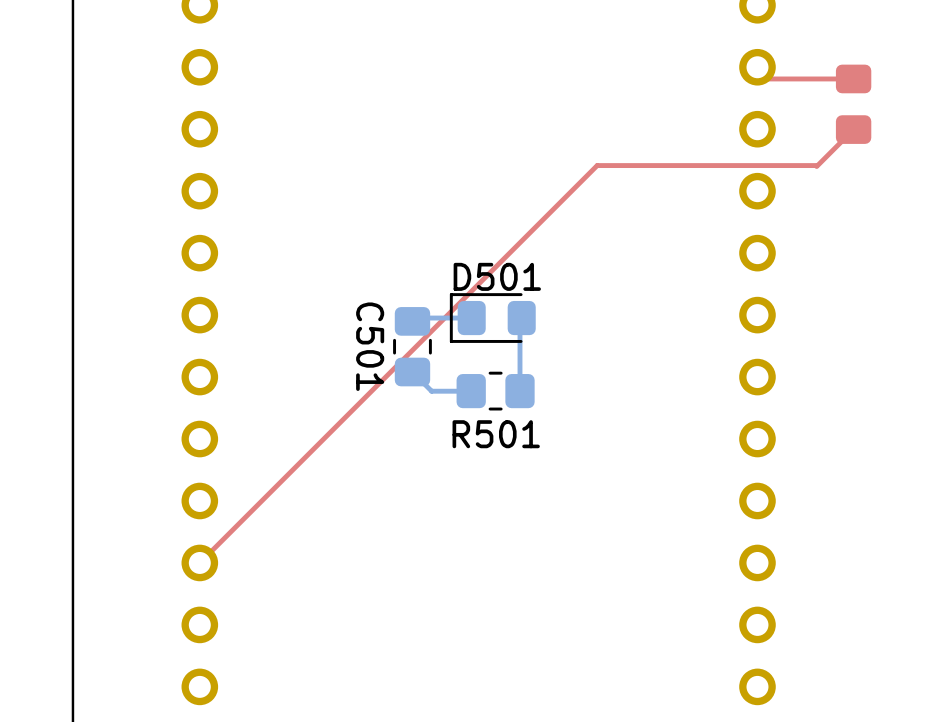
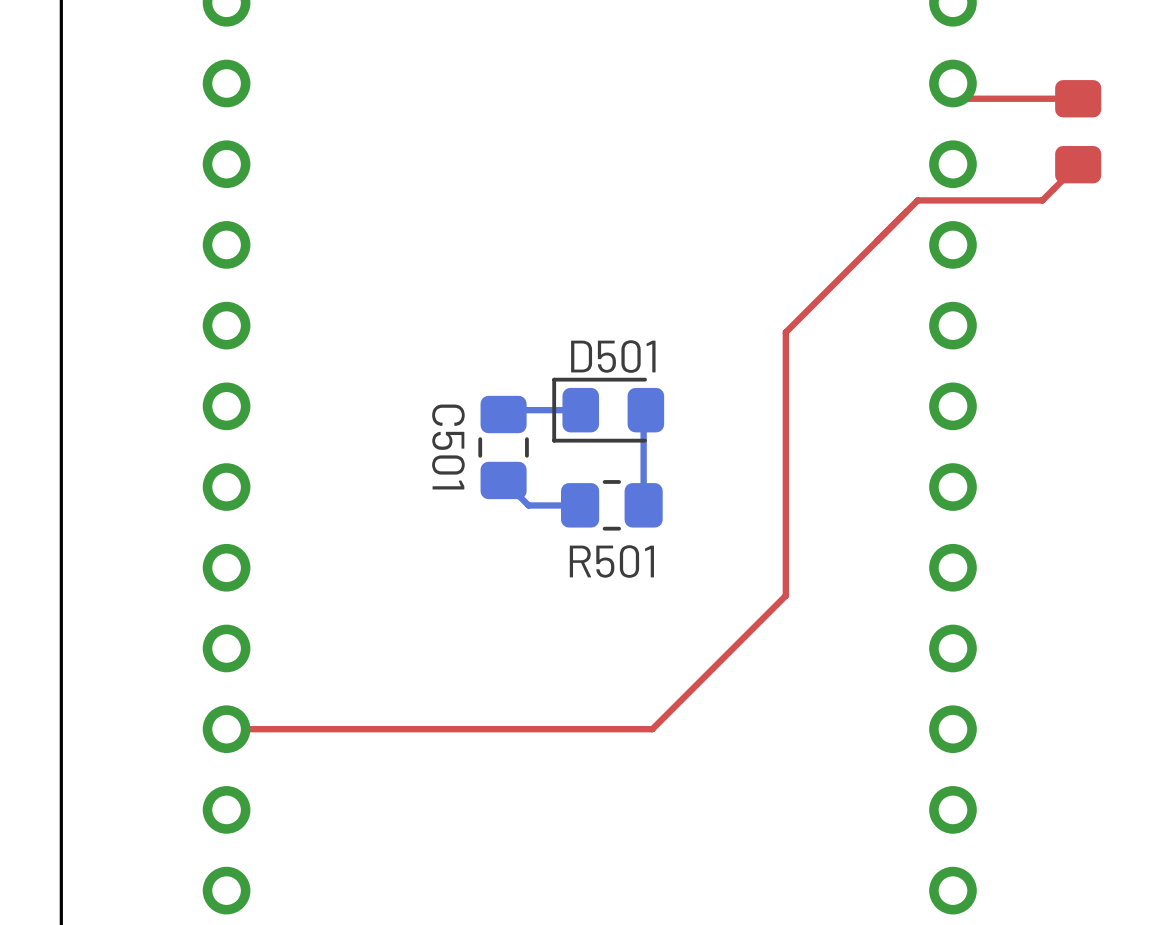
top track: (826, 157) (816, 166) -> none
top track: (816, 165) (597, 165) (199, 562) -> (1042, 200) (917, 200) (785, 332) (785, 595) (652, 729) (226, 729)

